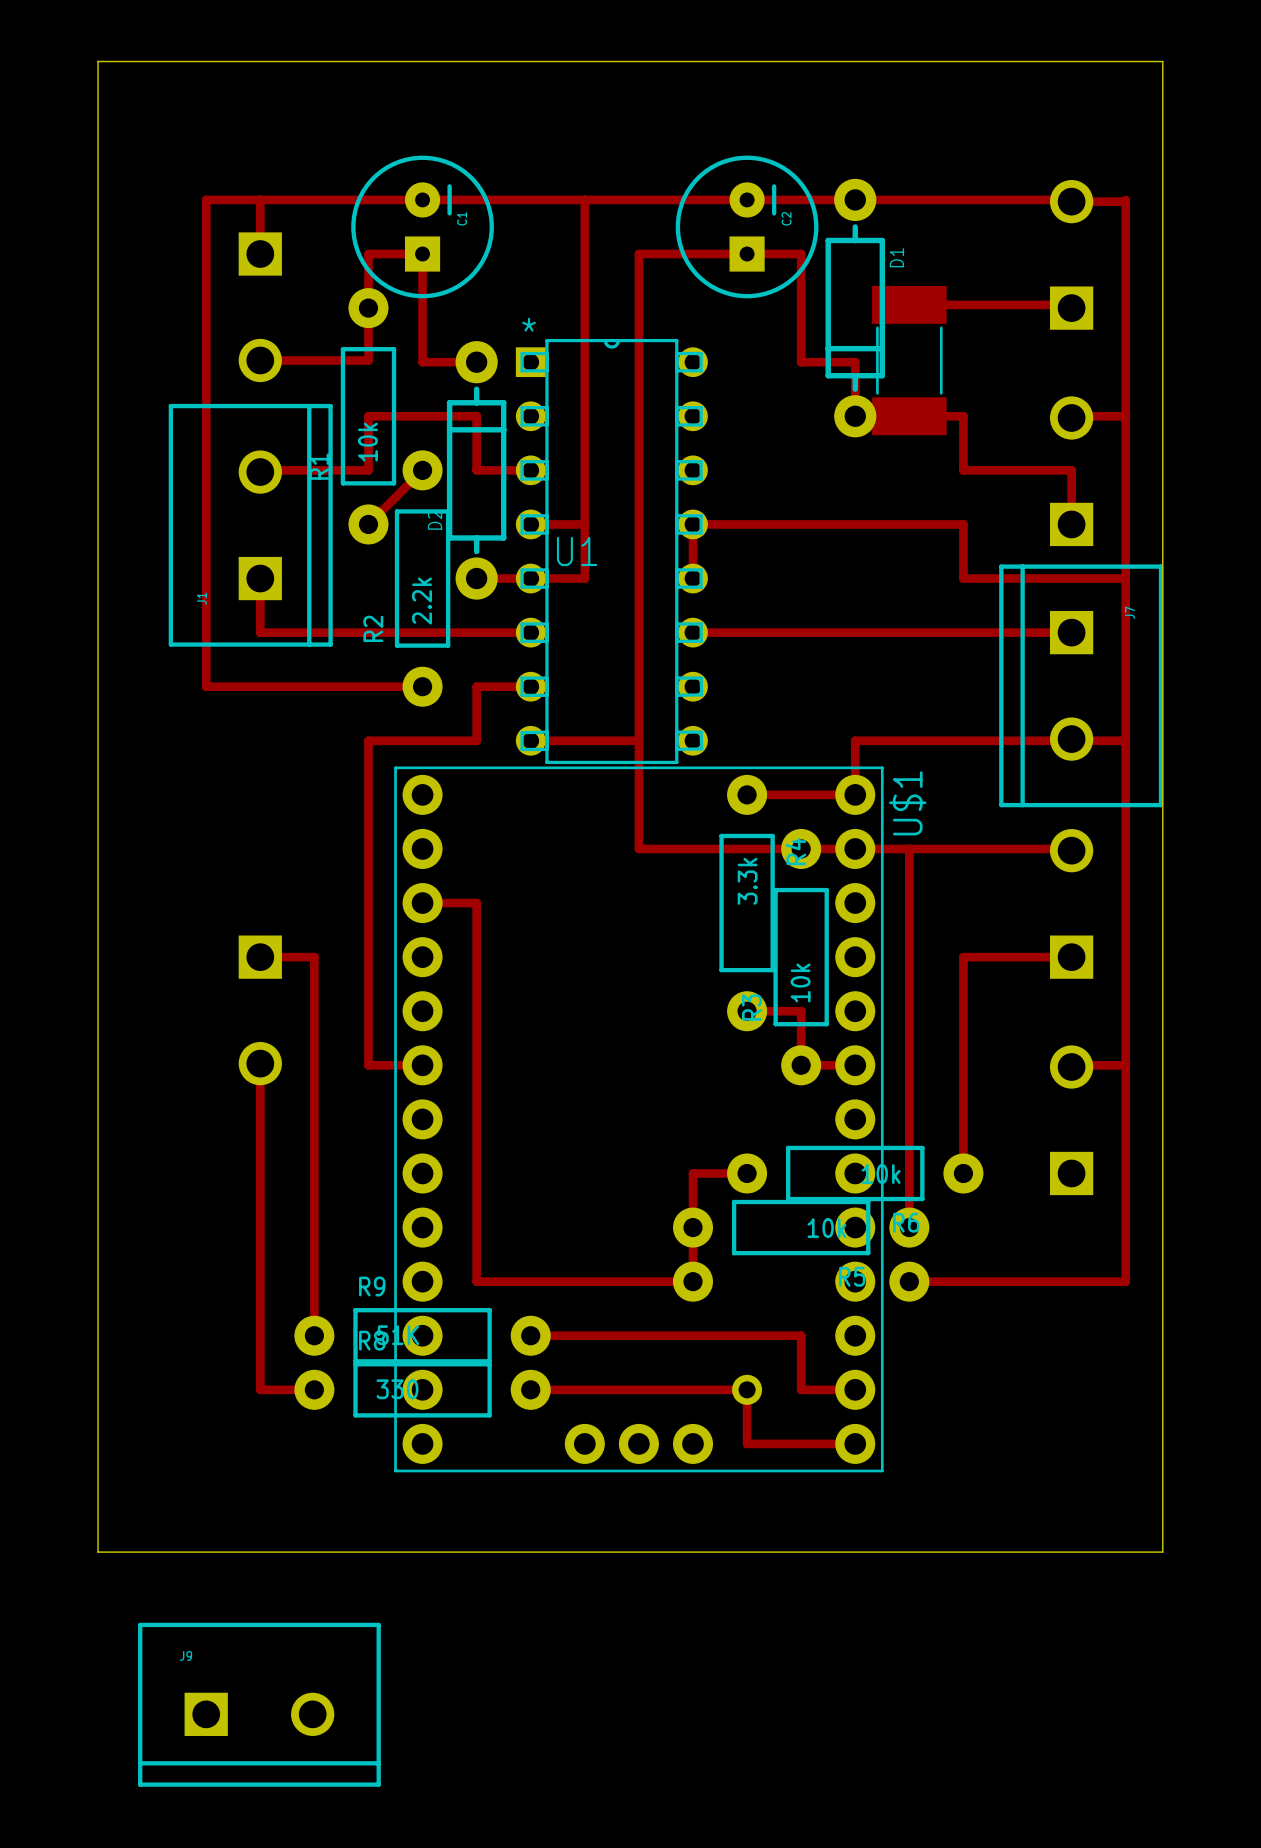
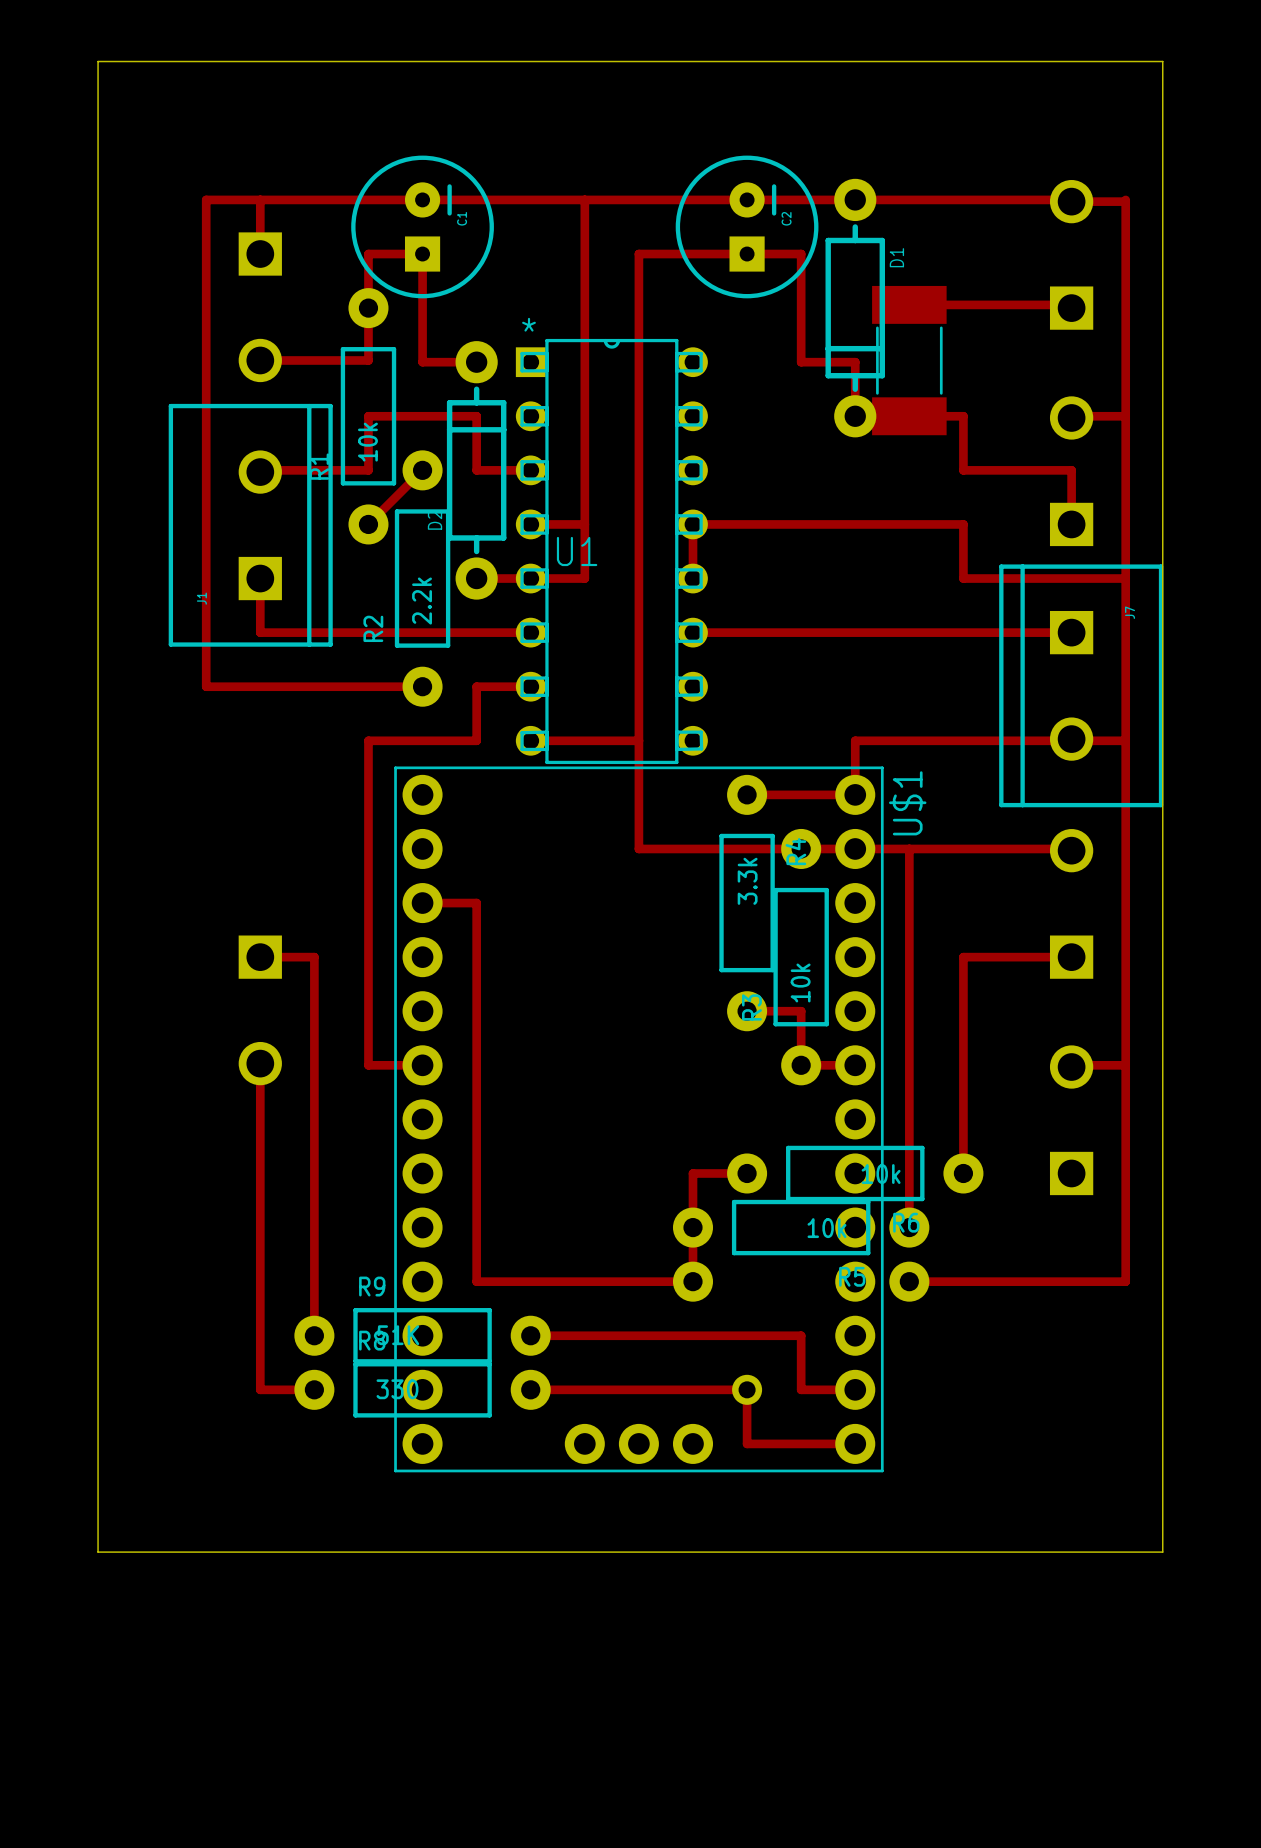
J9: (259, 1704) -> none

